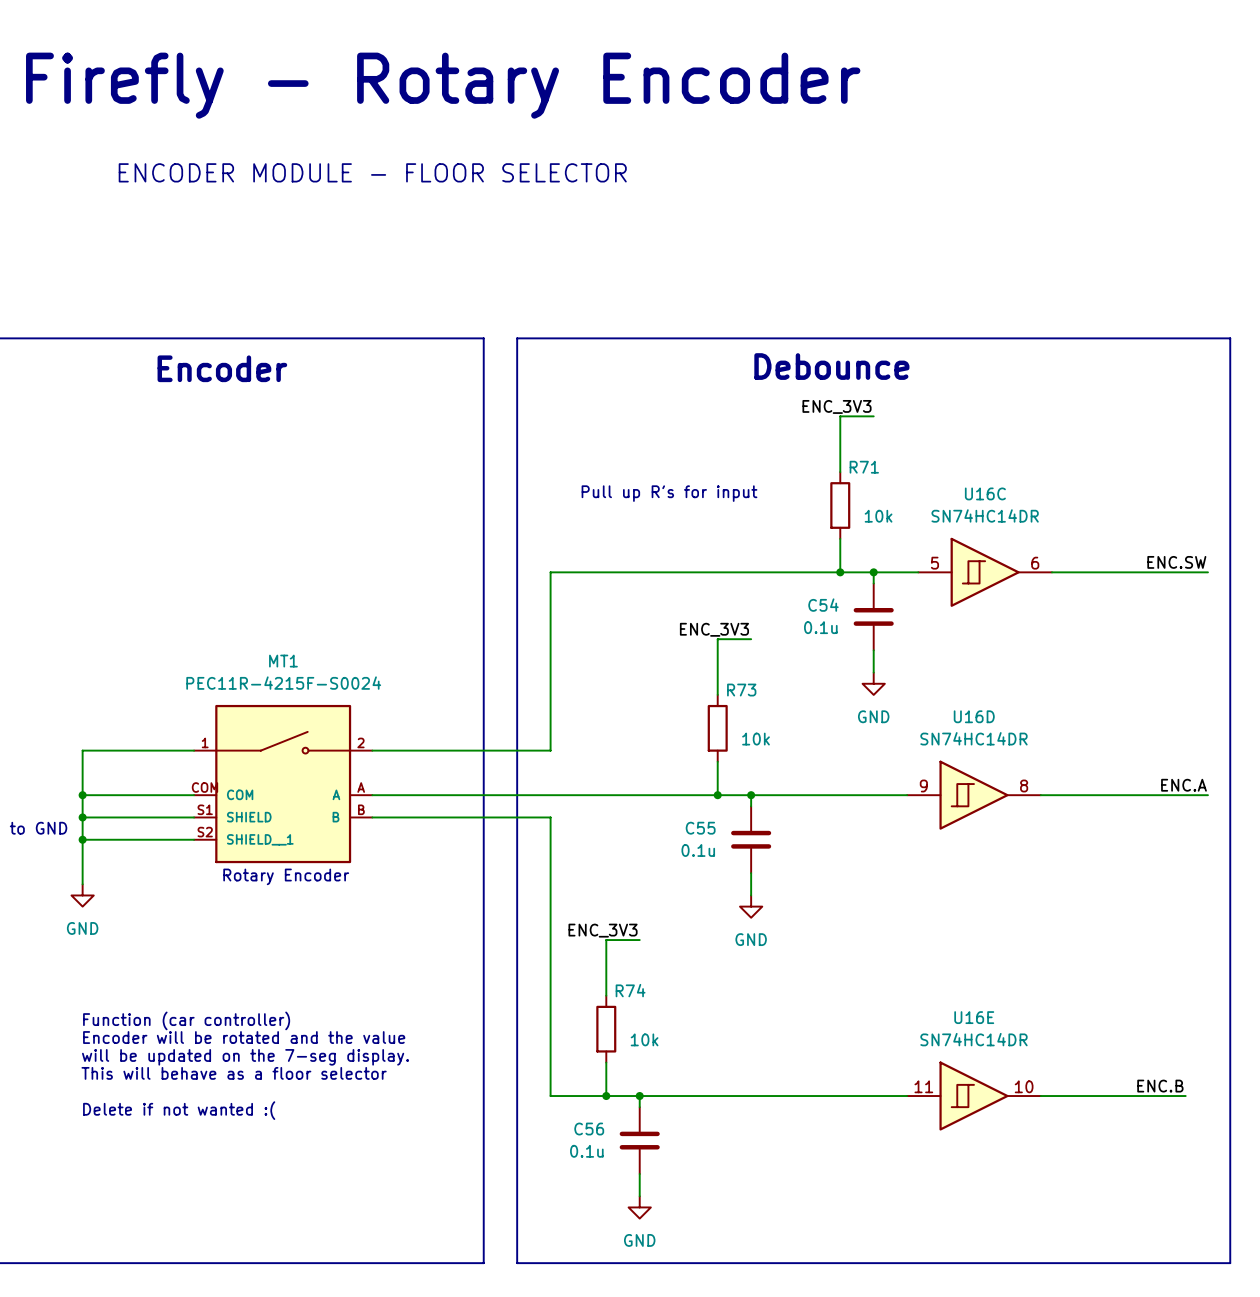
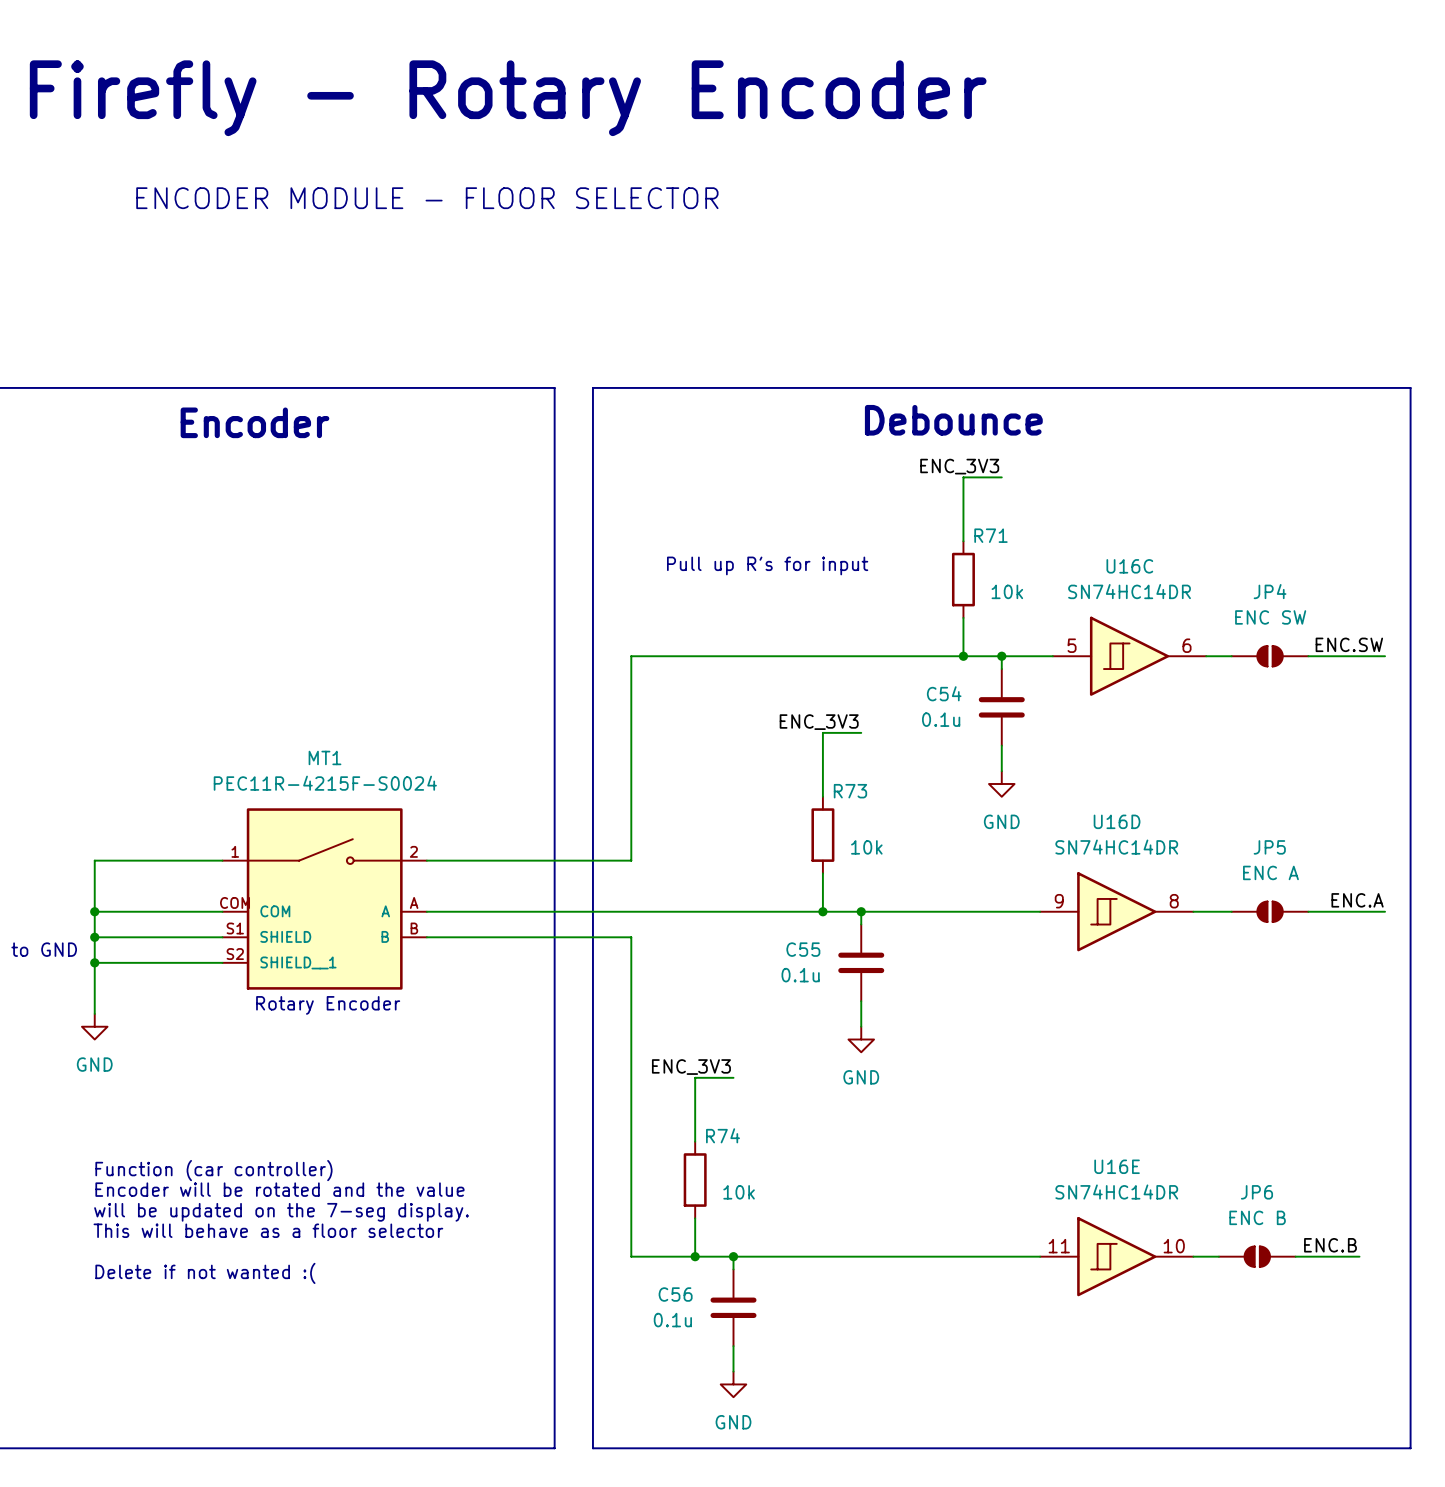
JP4: none -> ENC SW (1270, 656)
JP5: none -> ENC A (1270, 911)
JP6: none -> ENC B (1257, 1256)

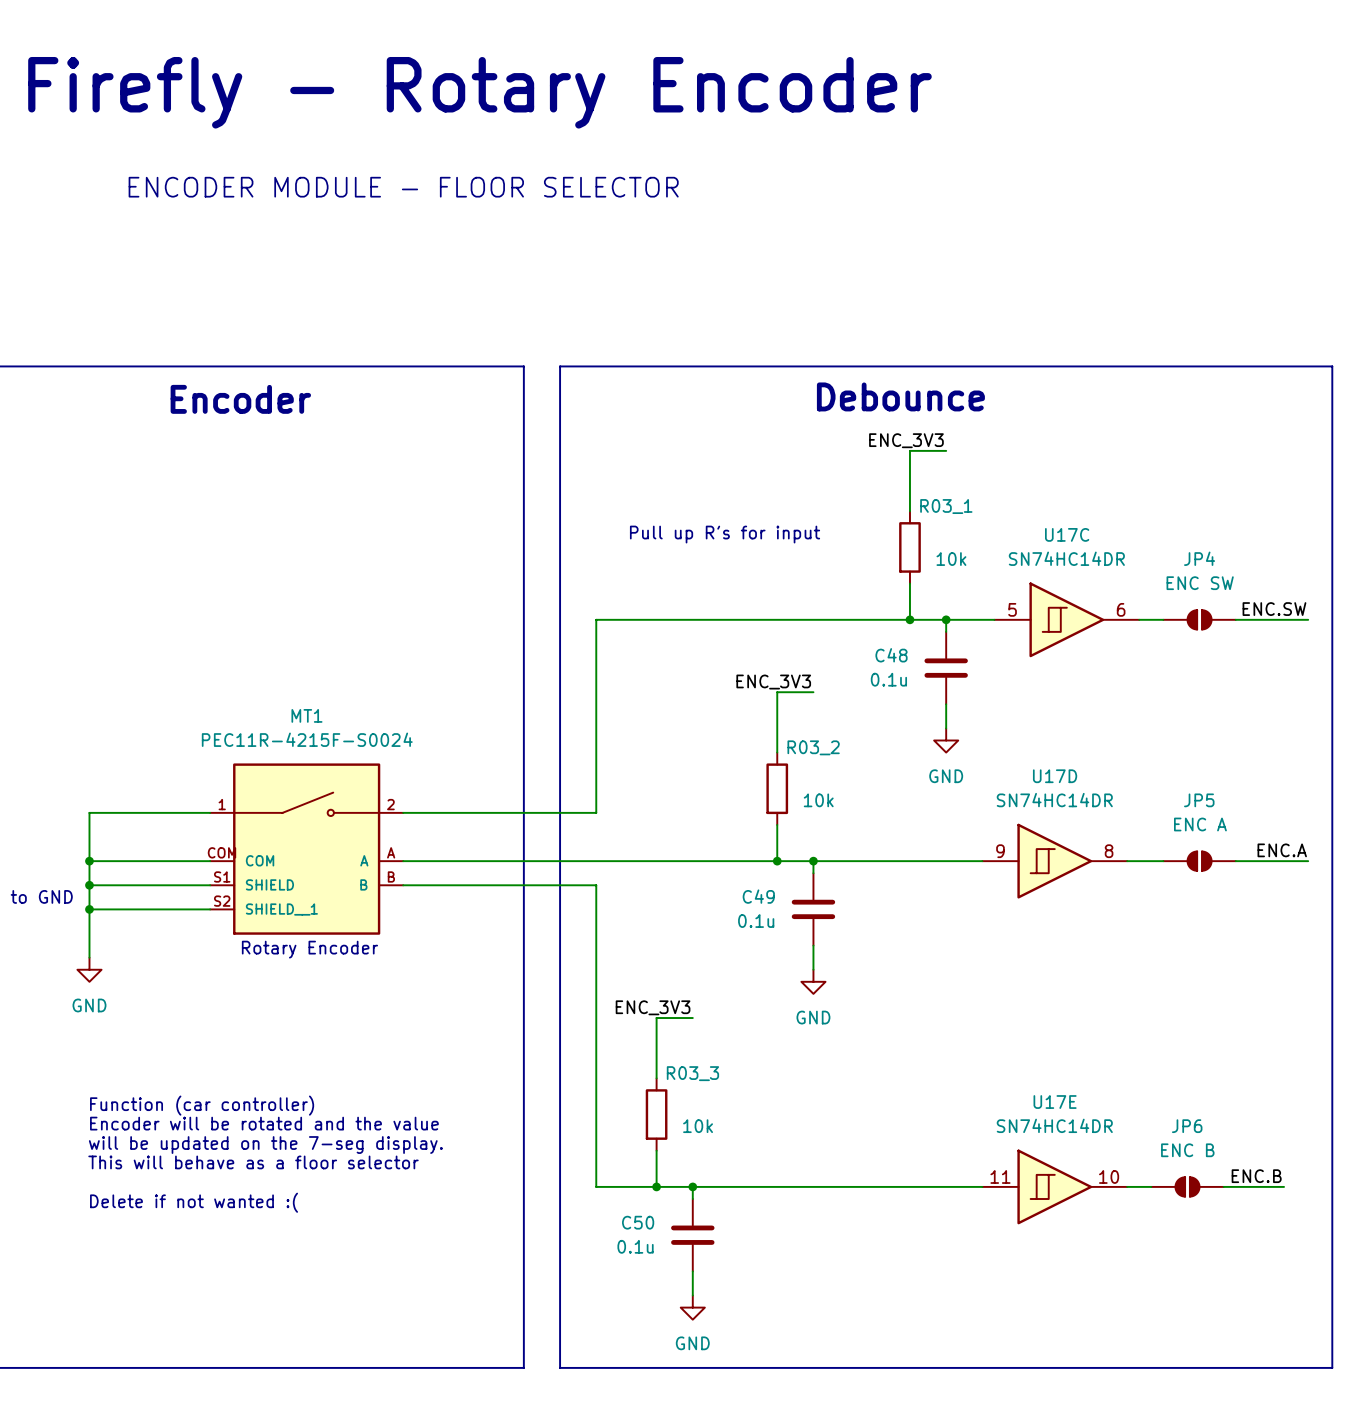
R71 name: R71 (990, 535) -> R03_1 (946, 506)
U16C name: U16C (1129, 566) -> U17C (1067, 534)
C54 name: C54 (944, 693) -> C48 (891, 655)
R73 name: R73 (850, 791) -> R03_2 (813, 747)
U16D name: U16D (1117, 821) -> U17D (1055, 776)
C55 name: C55 (803, 949) -> C49 (758, 896)
R74 name: R74 (723, 1135) -> R03_3 (692, 1073)
U16E name: U16E (1117, 1166) -> U17E (1055, 1102)
C56 name: C56 (675, 1294) -> C50 (638, 1222)

